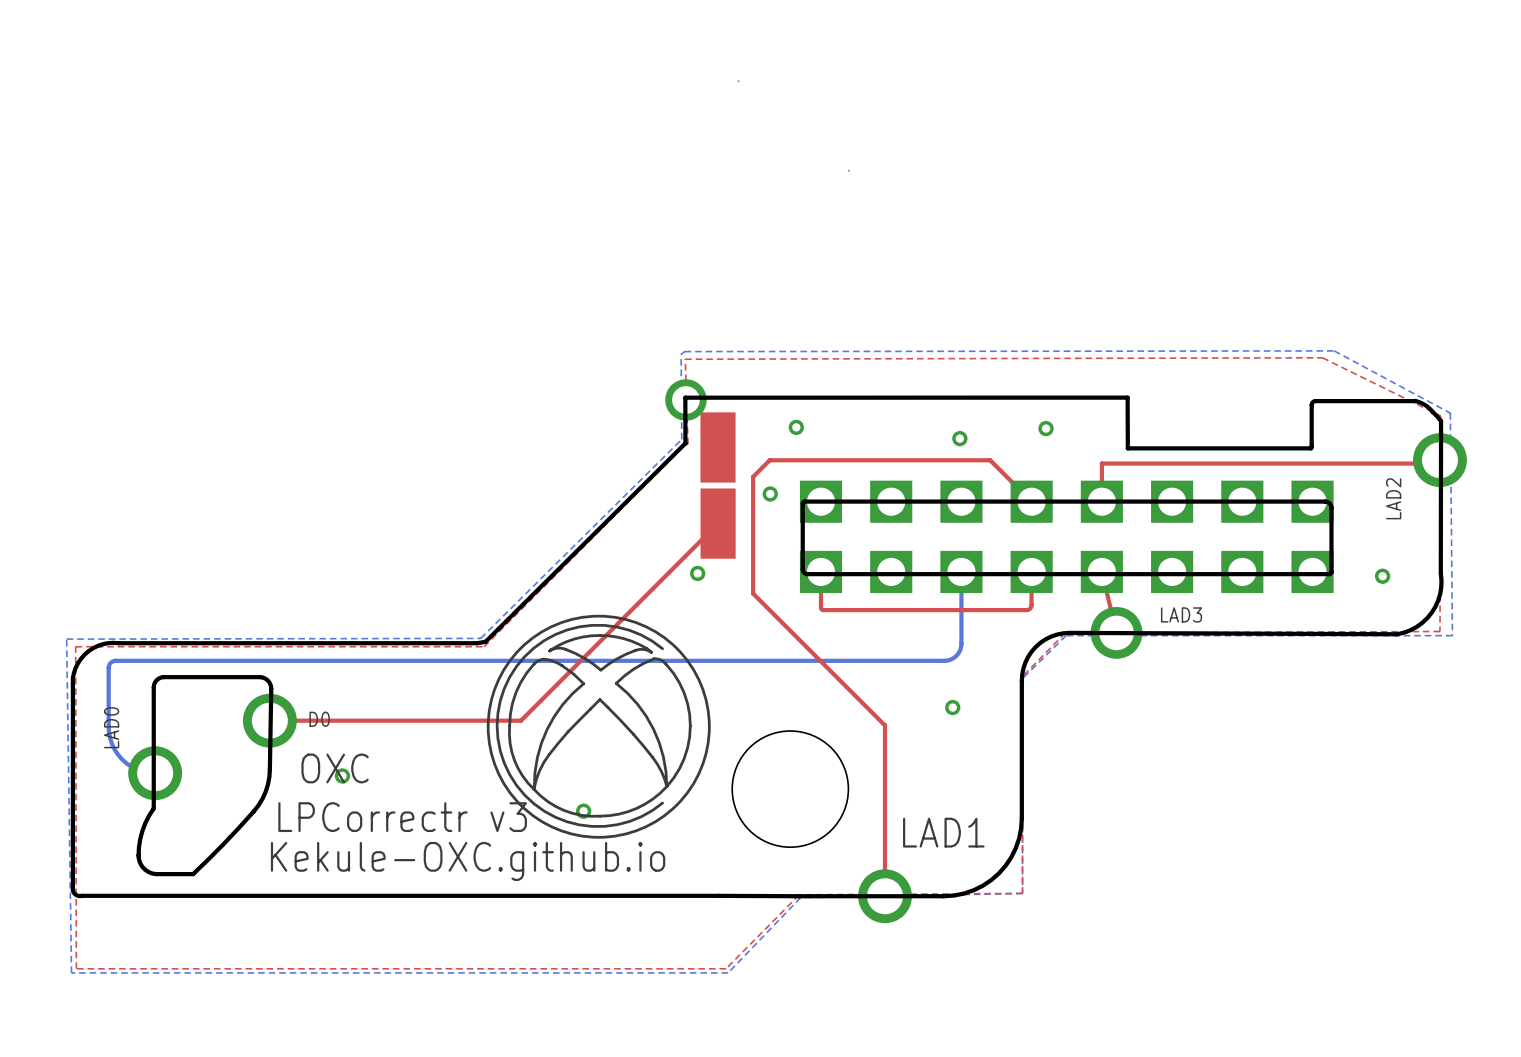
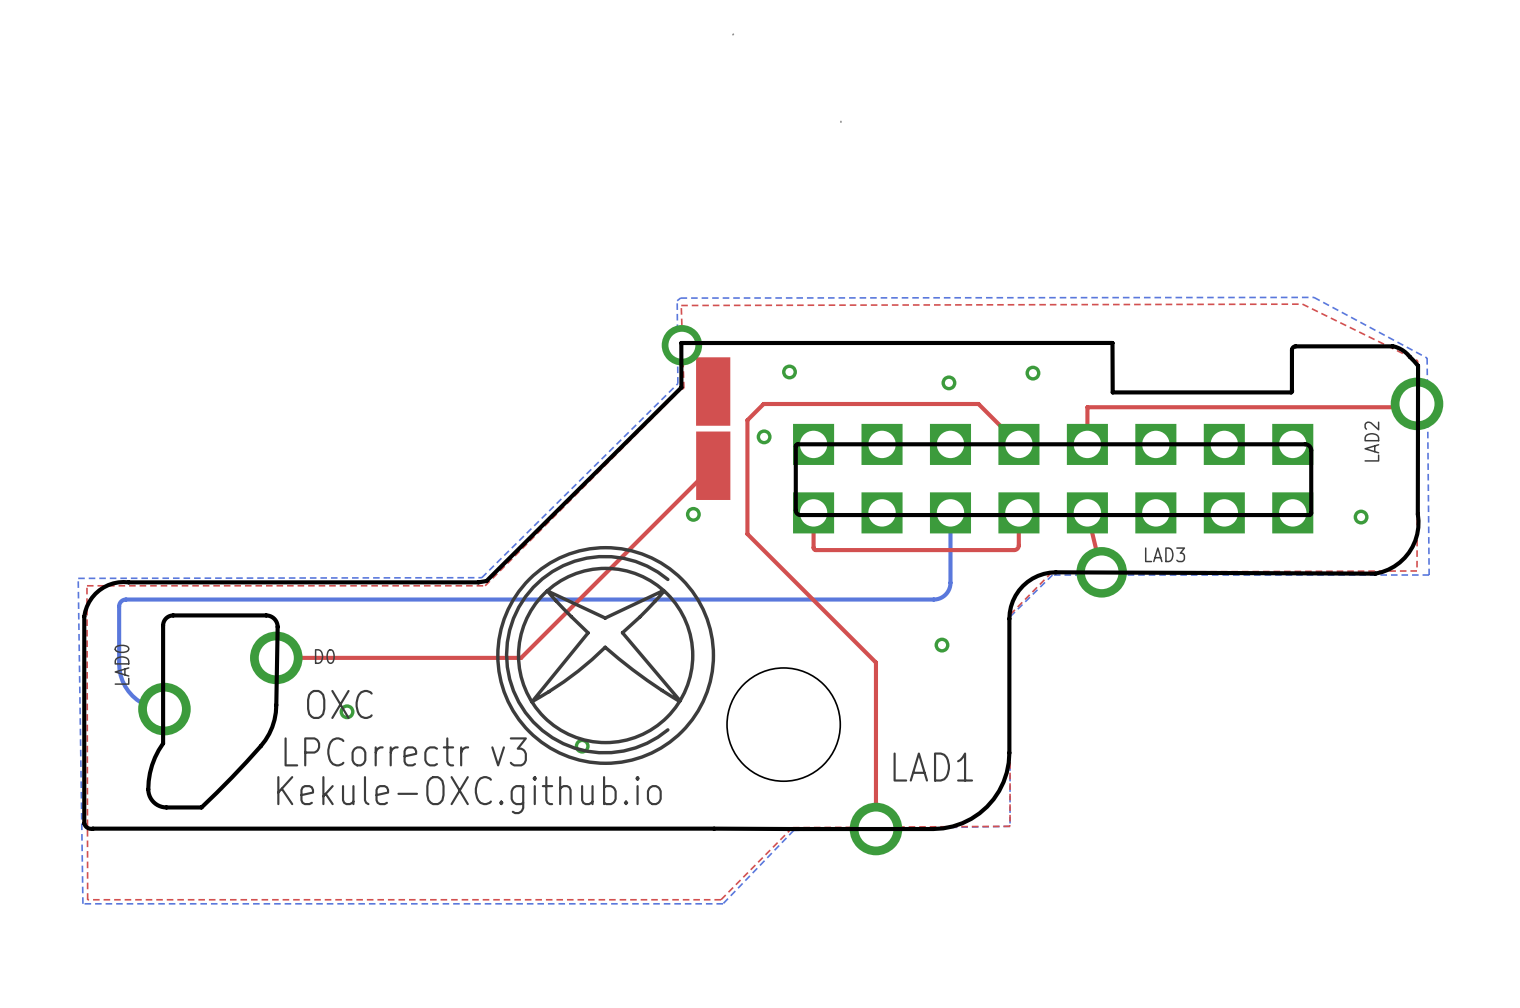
drawing shape: [486, 614, 711, 839] -> [496, 545, 716, 766]

